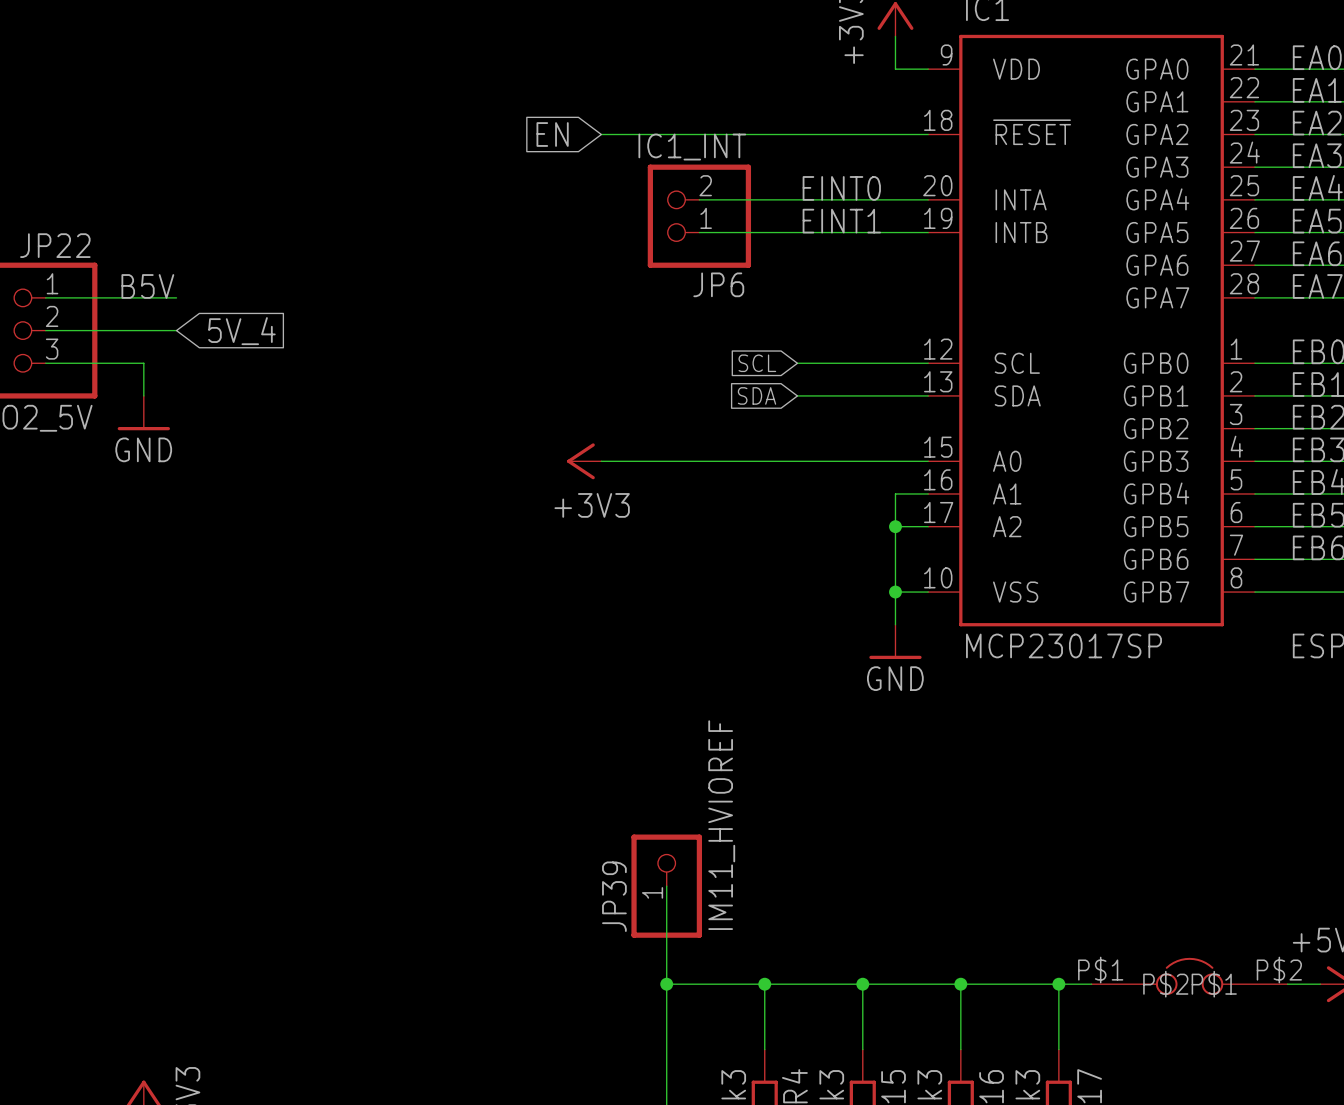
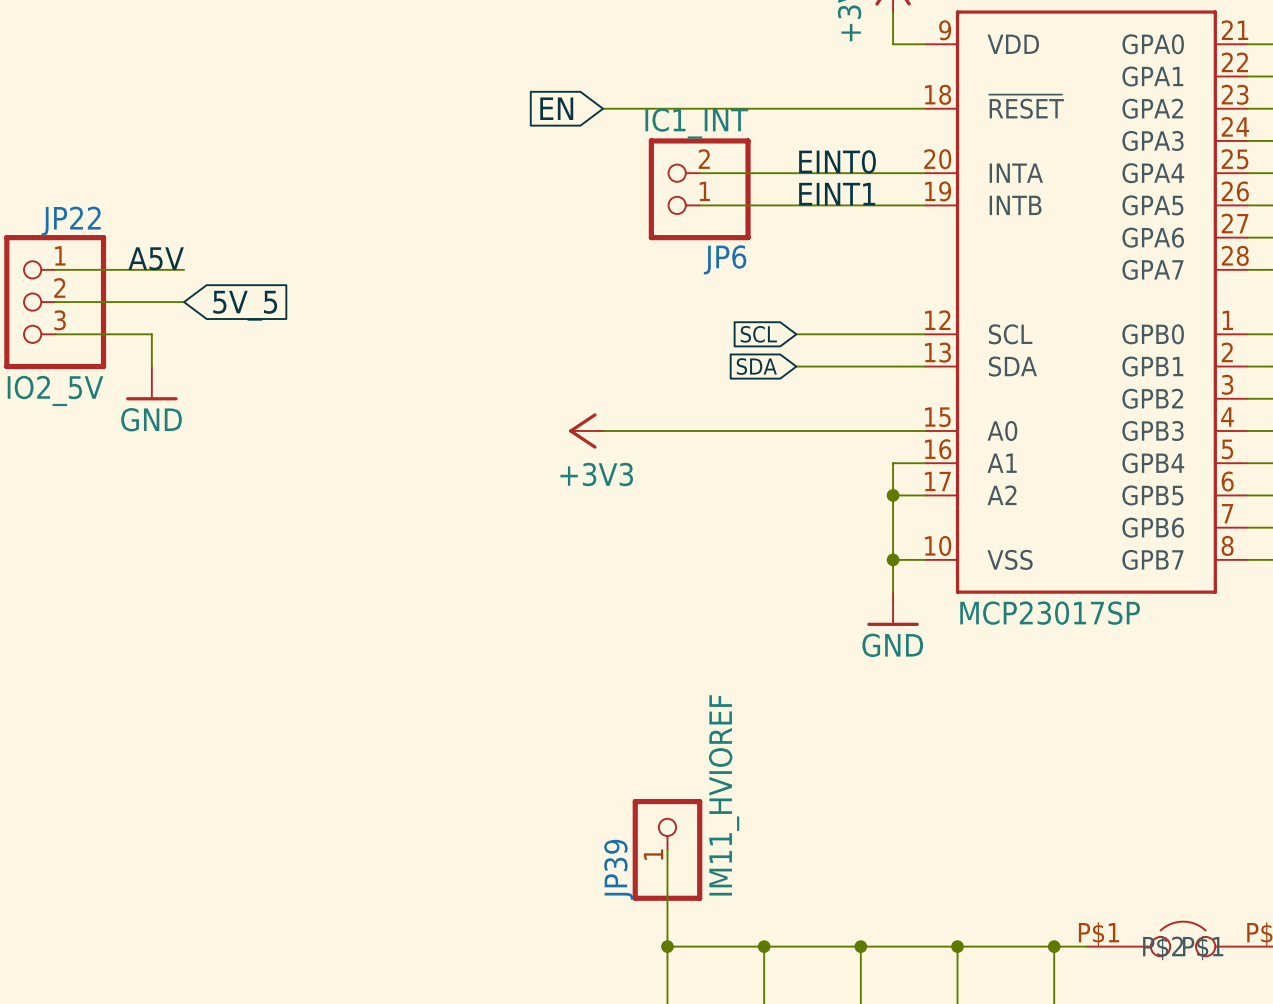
label: B5V (147, 286) -> A5V (156, 258)
global label: 5V_4 (241, 331) -> 5V_5 (245, 305)

